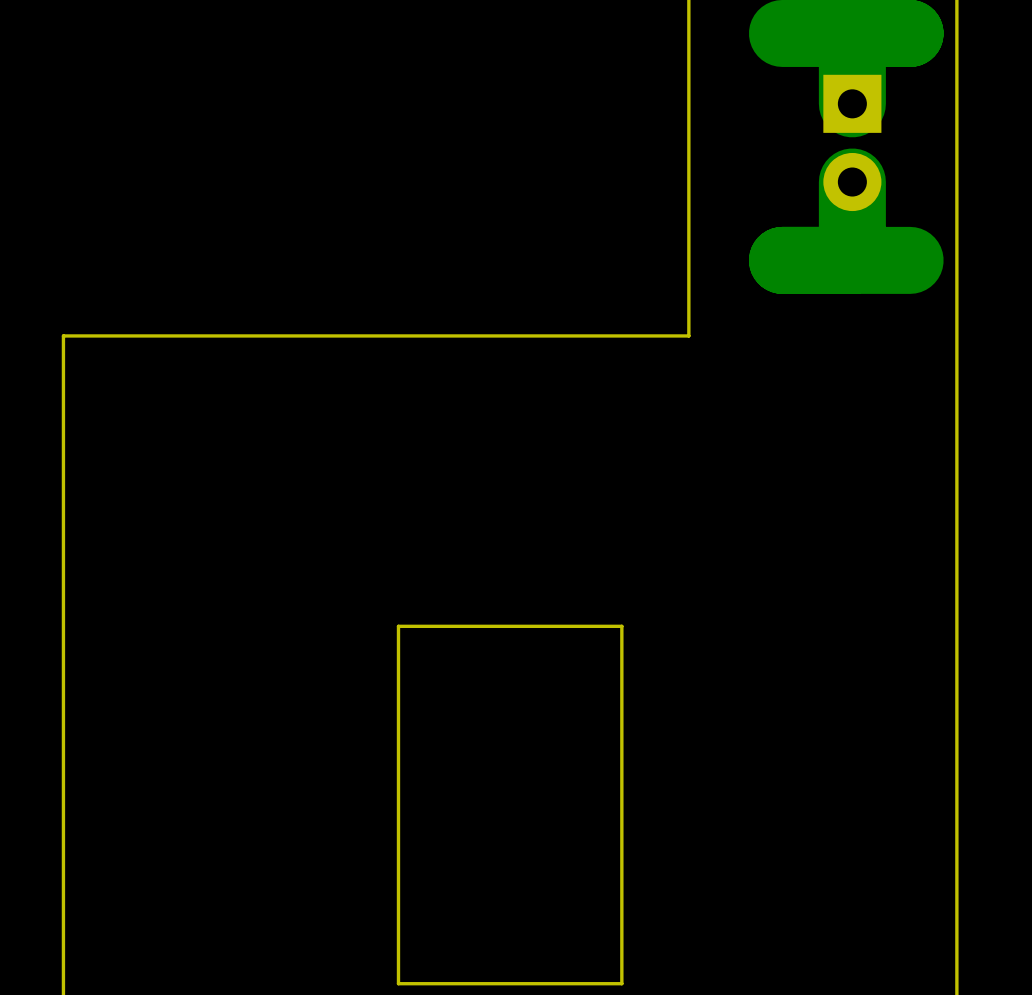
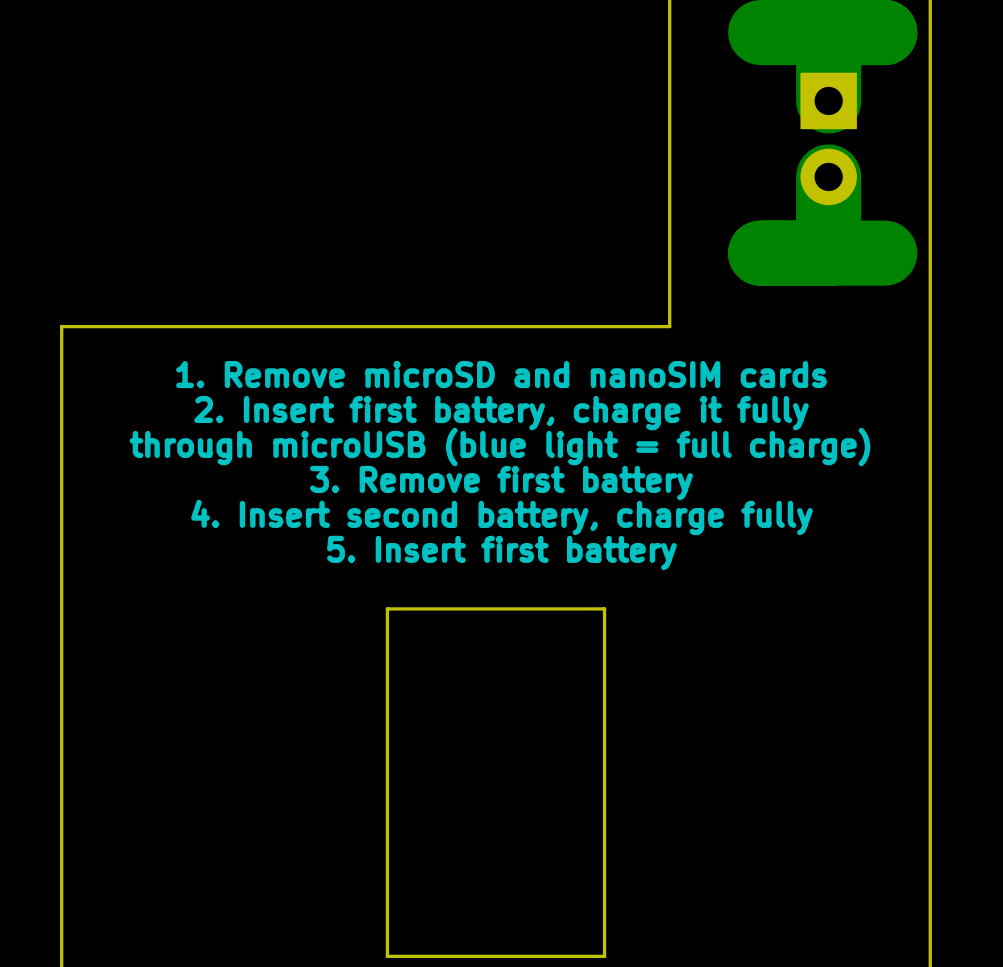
text: none -> 1. Remove microSD and nanoSIM cards (501, 374)
text: none -> 2. Insert first battery, charge it fully (501, 413)
text: none -> through microUSB (blue light = full charge) (499, 447)
text: none -> 3. Remove first battery (501, 483)
text: none -> 4. Insert second battery, charge fully (501, 517)
text: none -> 5. Insert first battery (501, 552)

